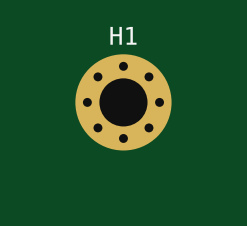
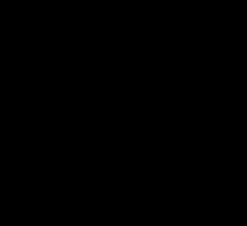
H1: (123, 102) -> none

